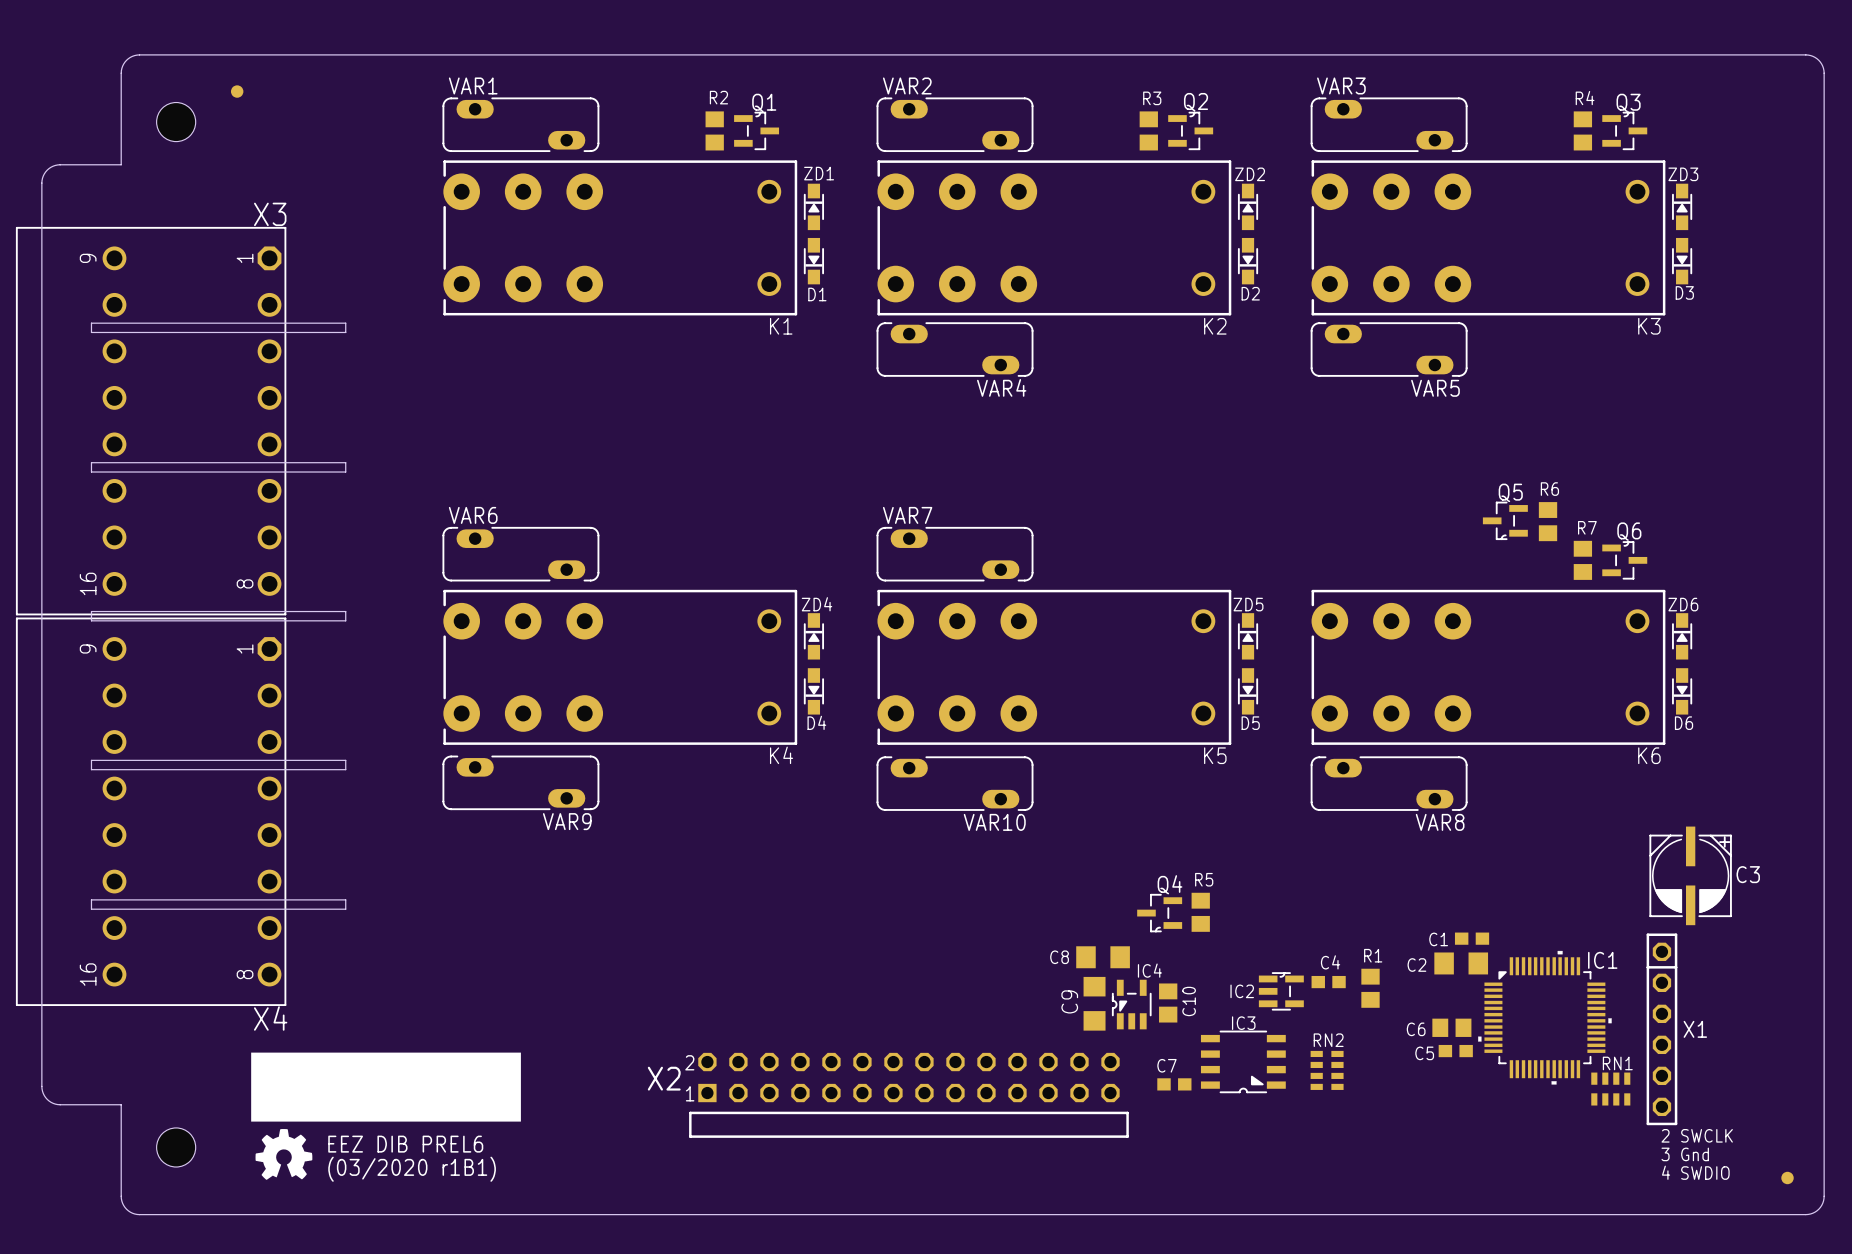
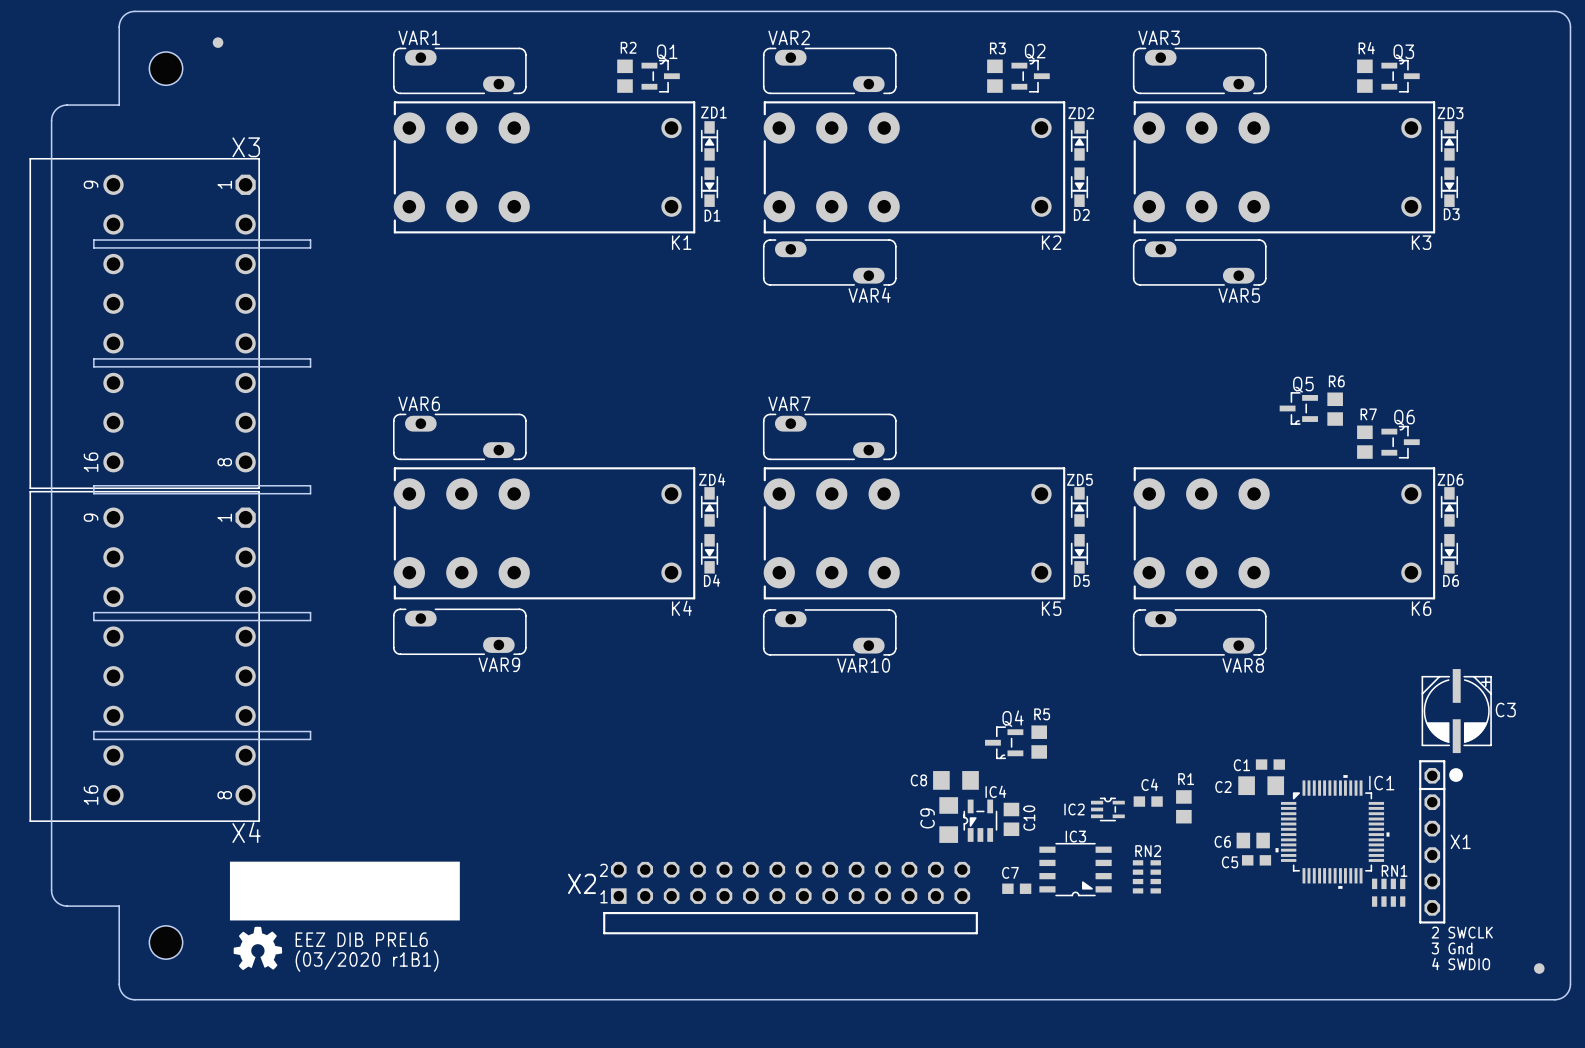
drawing: none -> [1449, 768, 1463, 782]
IC2 footprint: [1258, 972, 1304, 1011] -> [1090, 797, 1125, 822]

